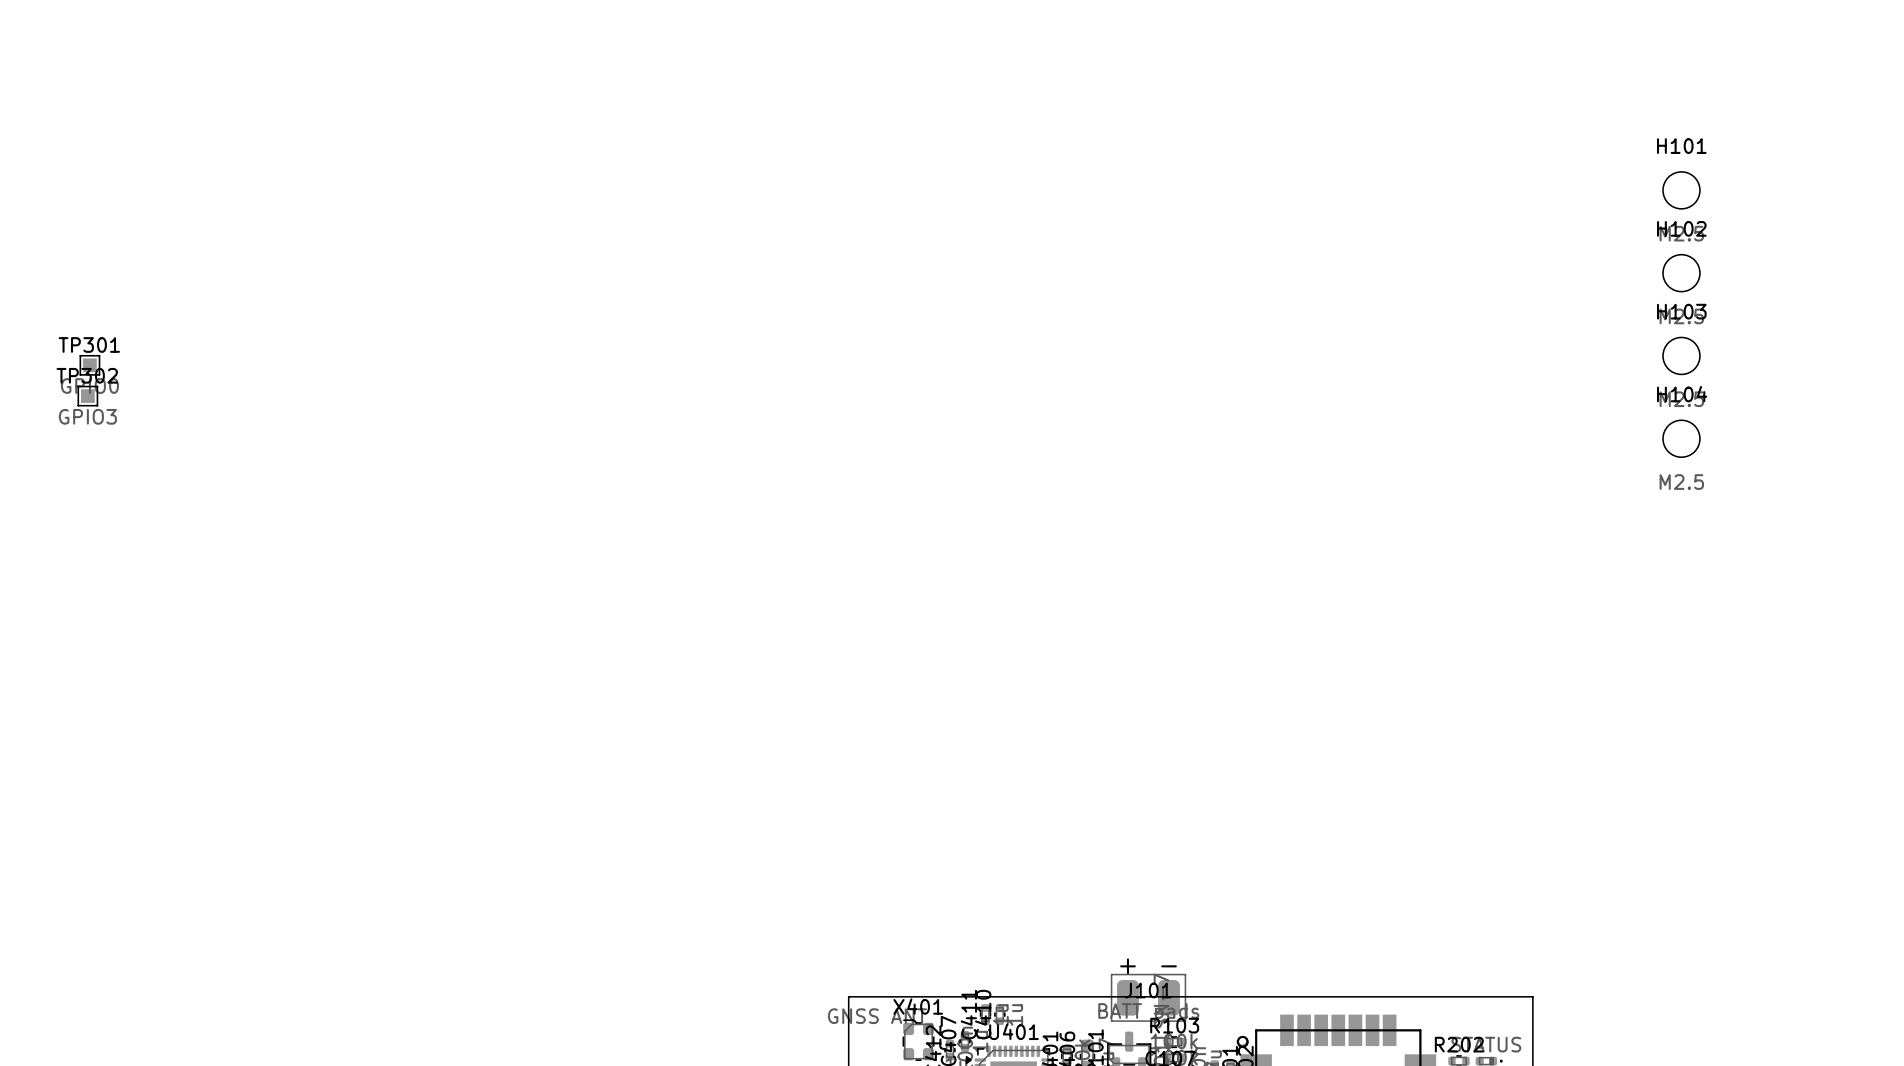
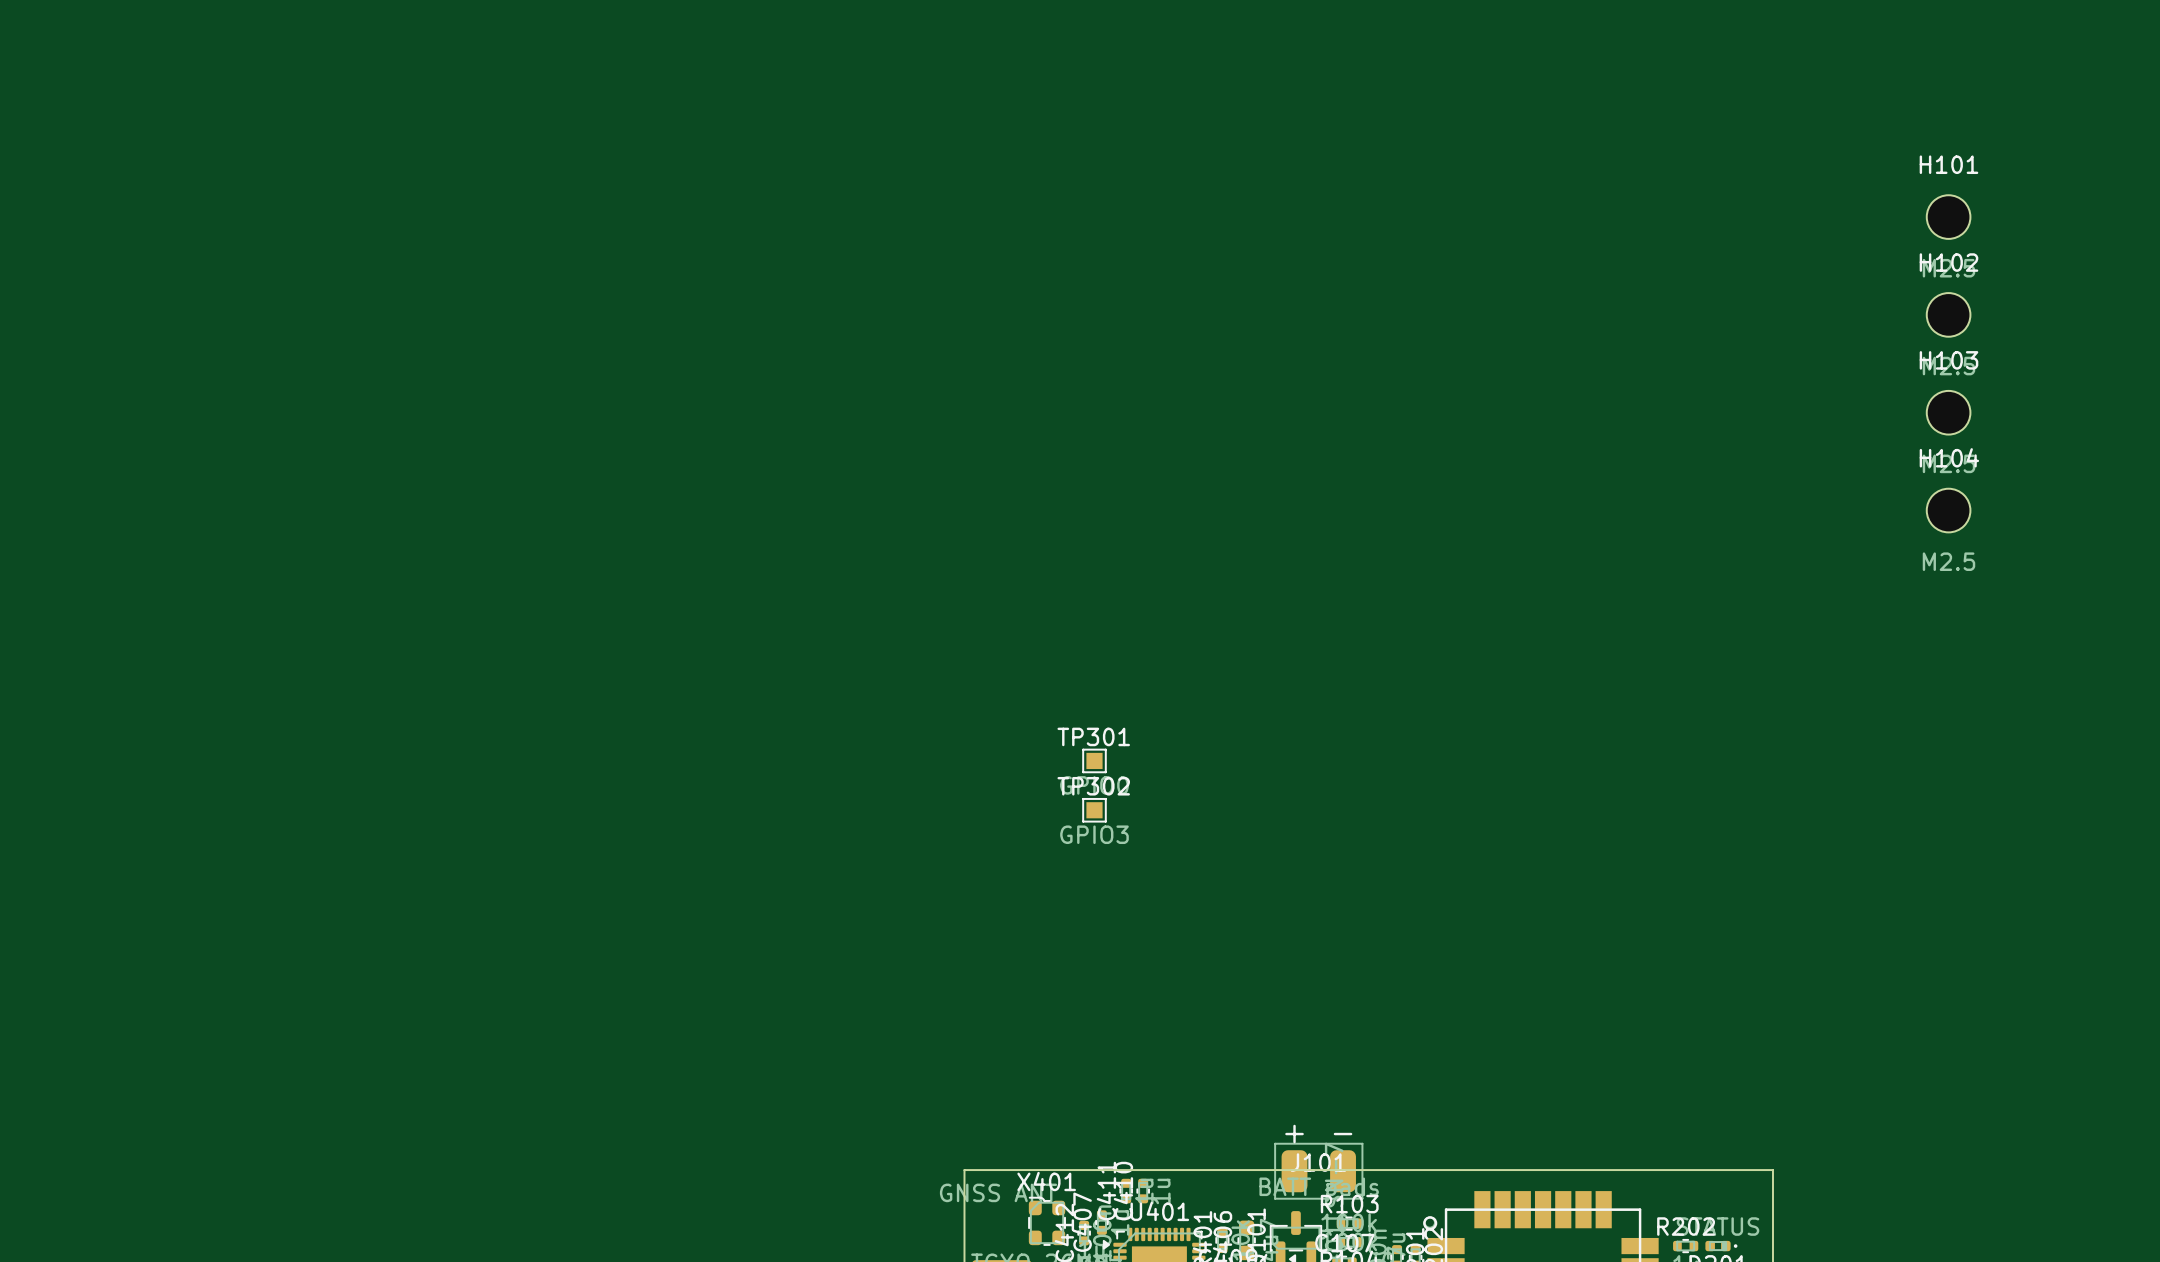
TP301 position: (89, 365) -> (1094, 760)
TP302 position: (87, 396) -> (1094, 810)

